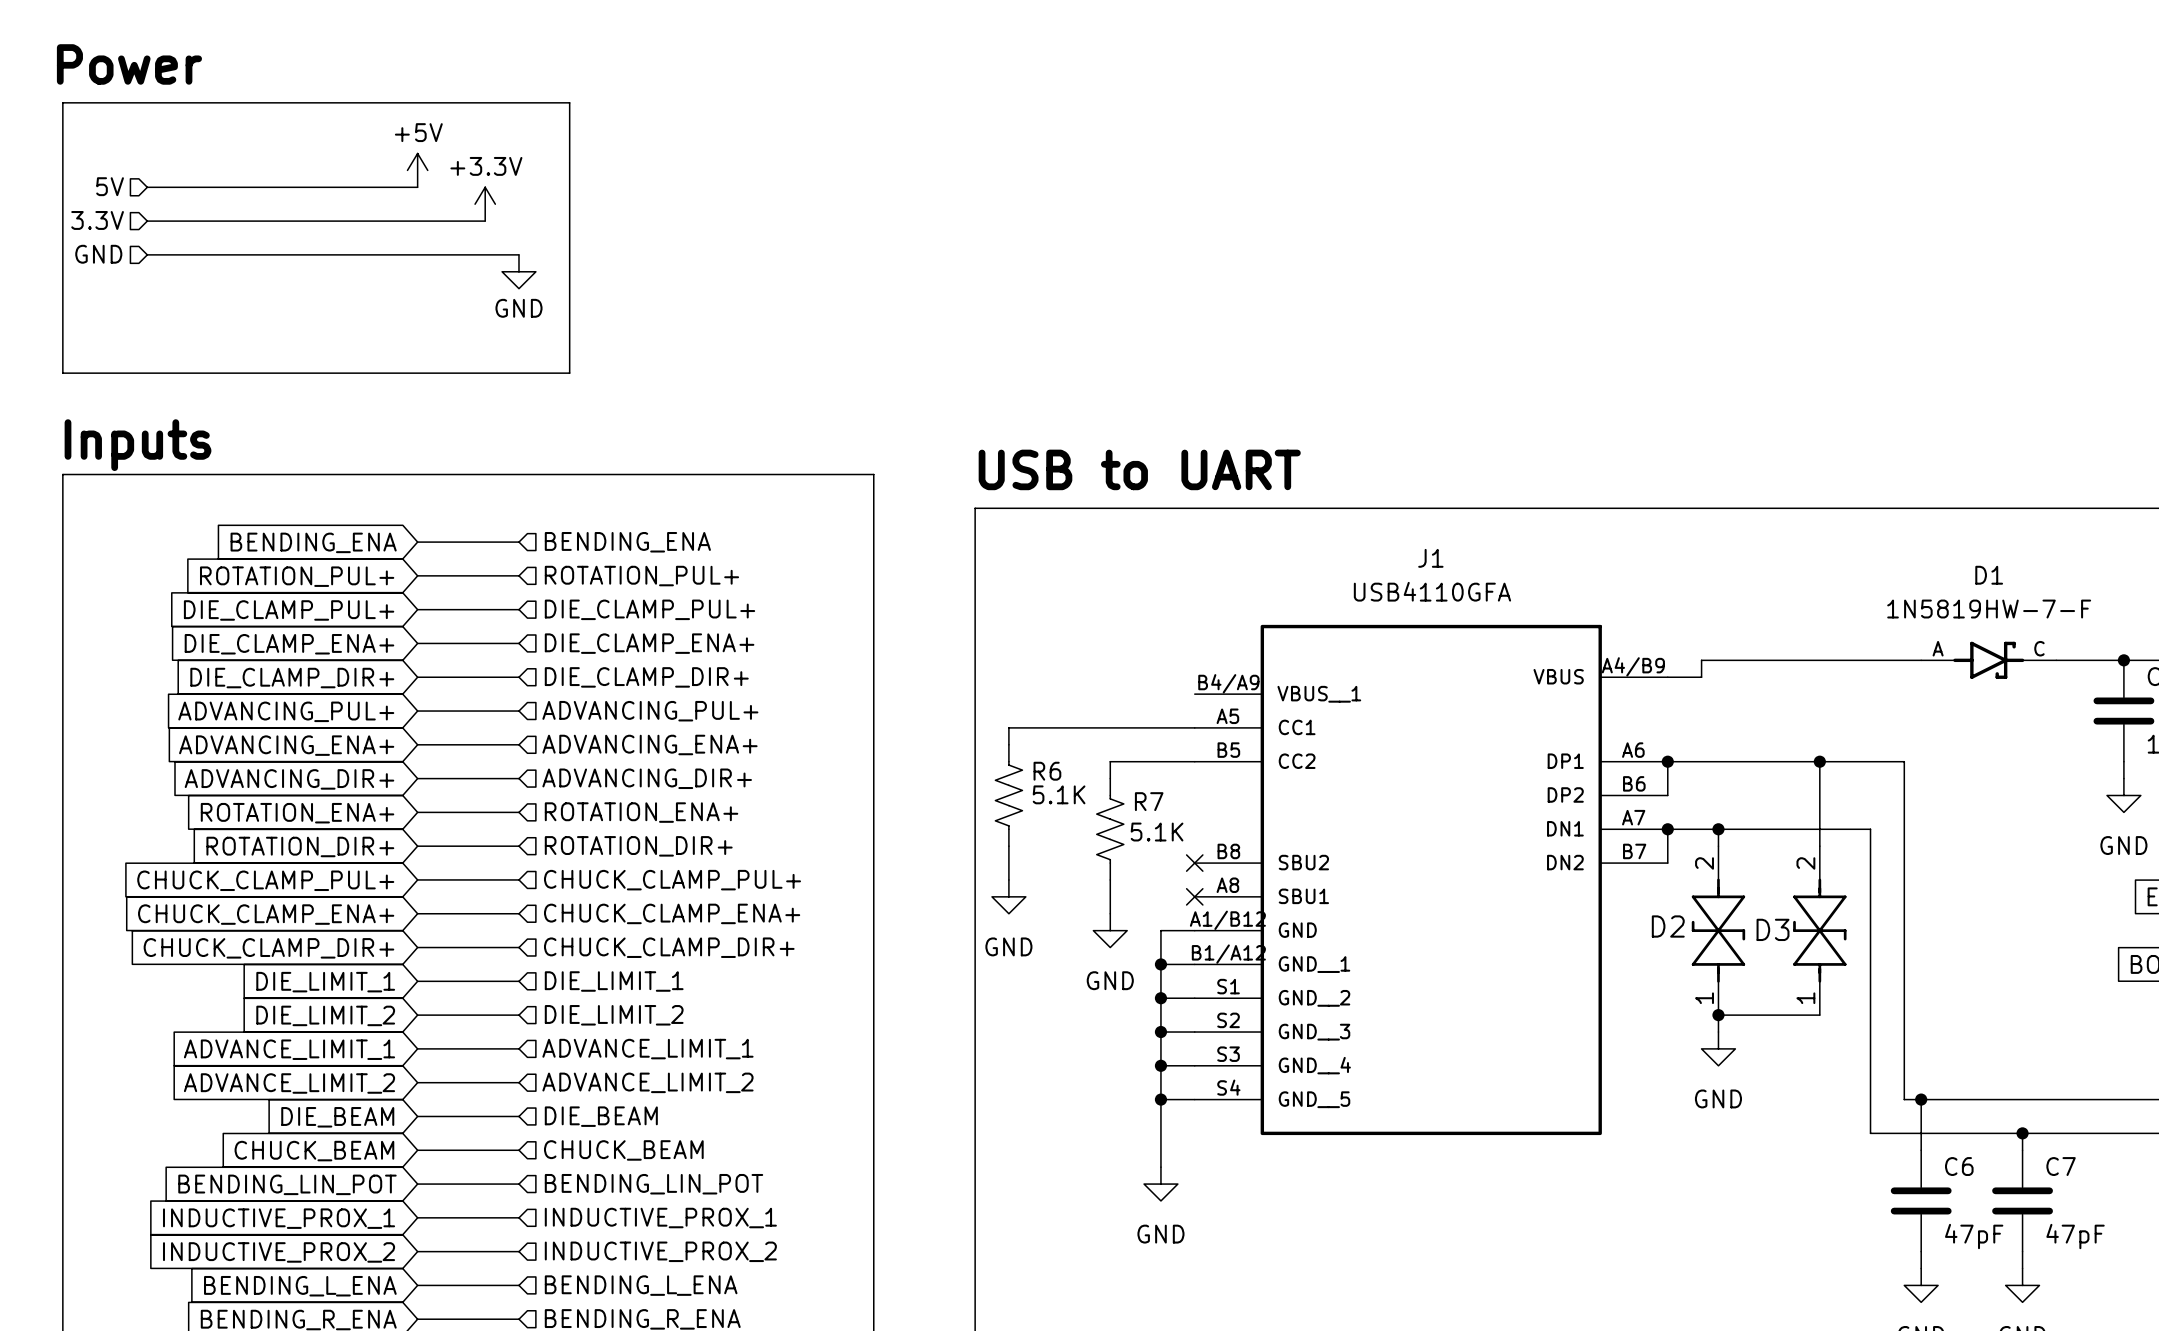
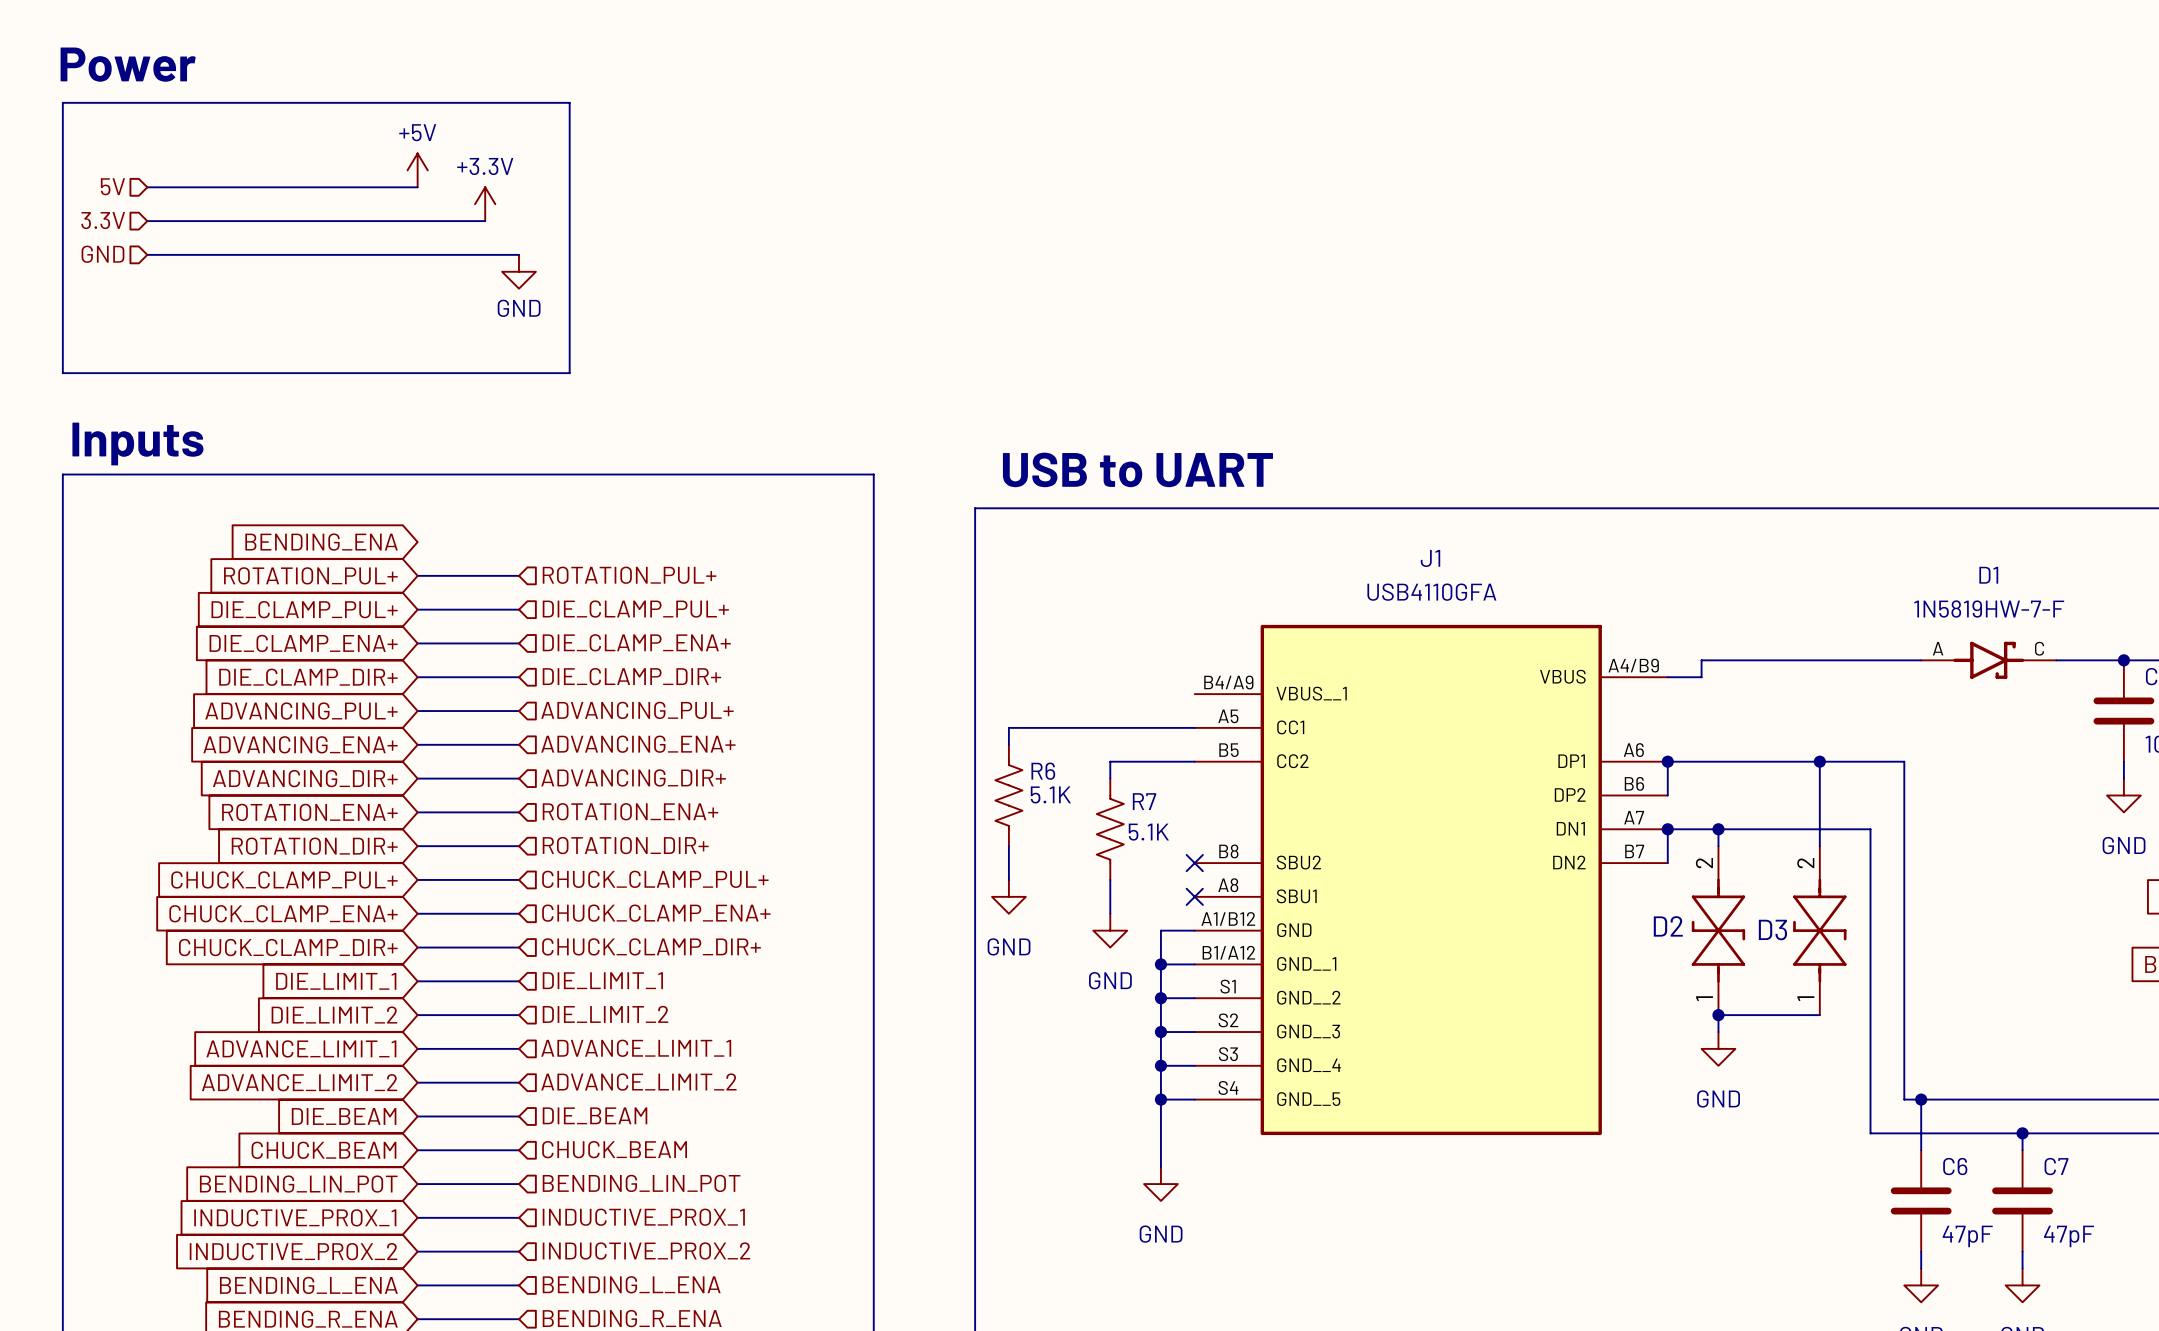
wire: (417, 542) (518, 542) -> none
hierarchical label: BENDING_ENA (627, 542) -> none

